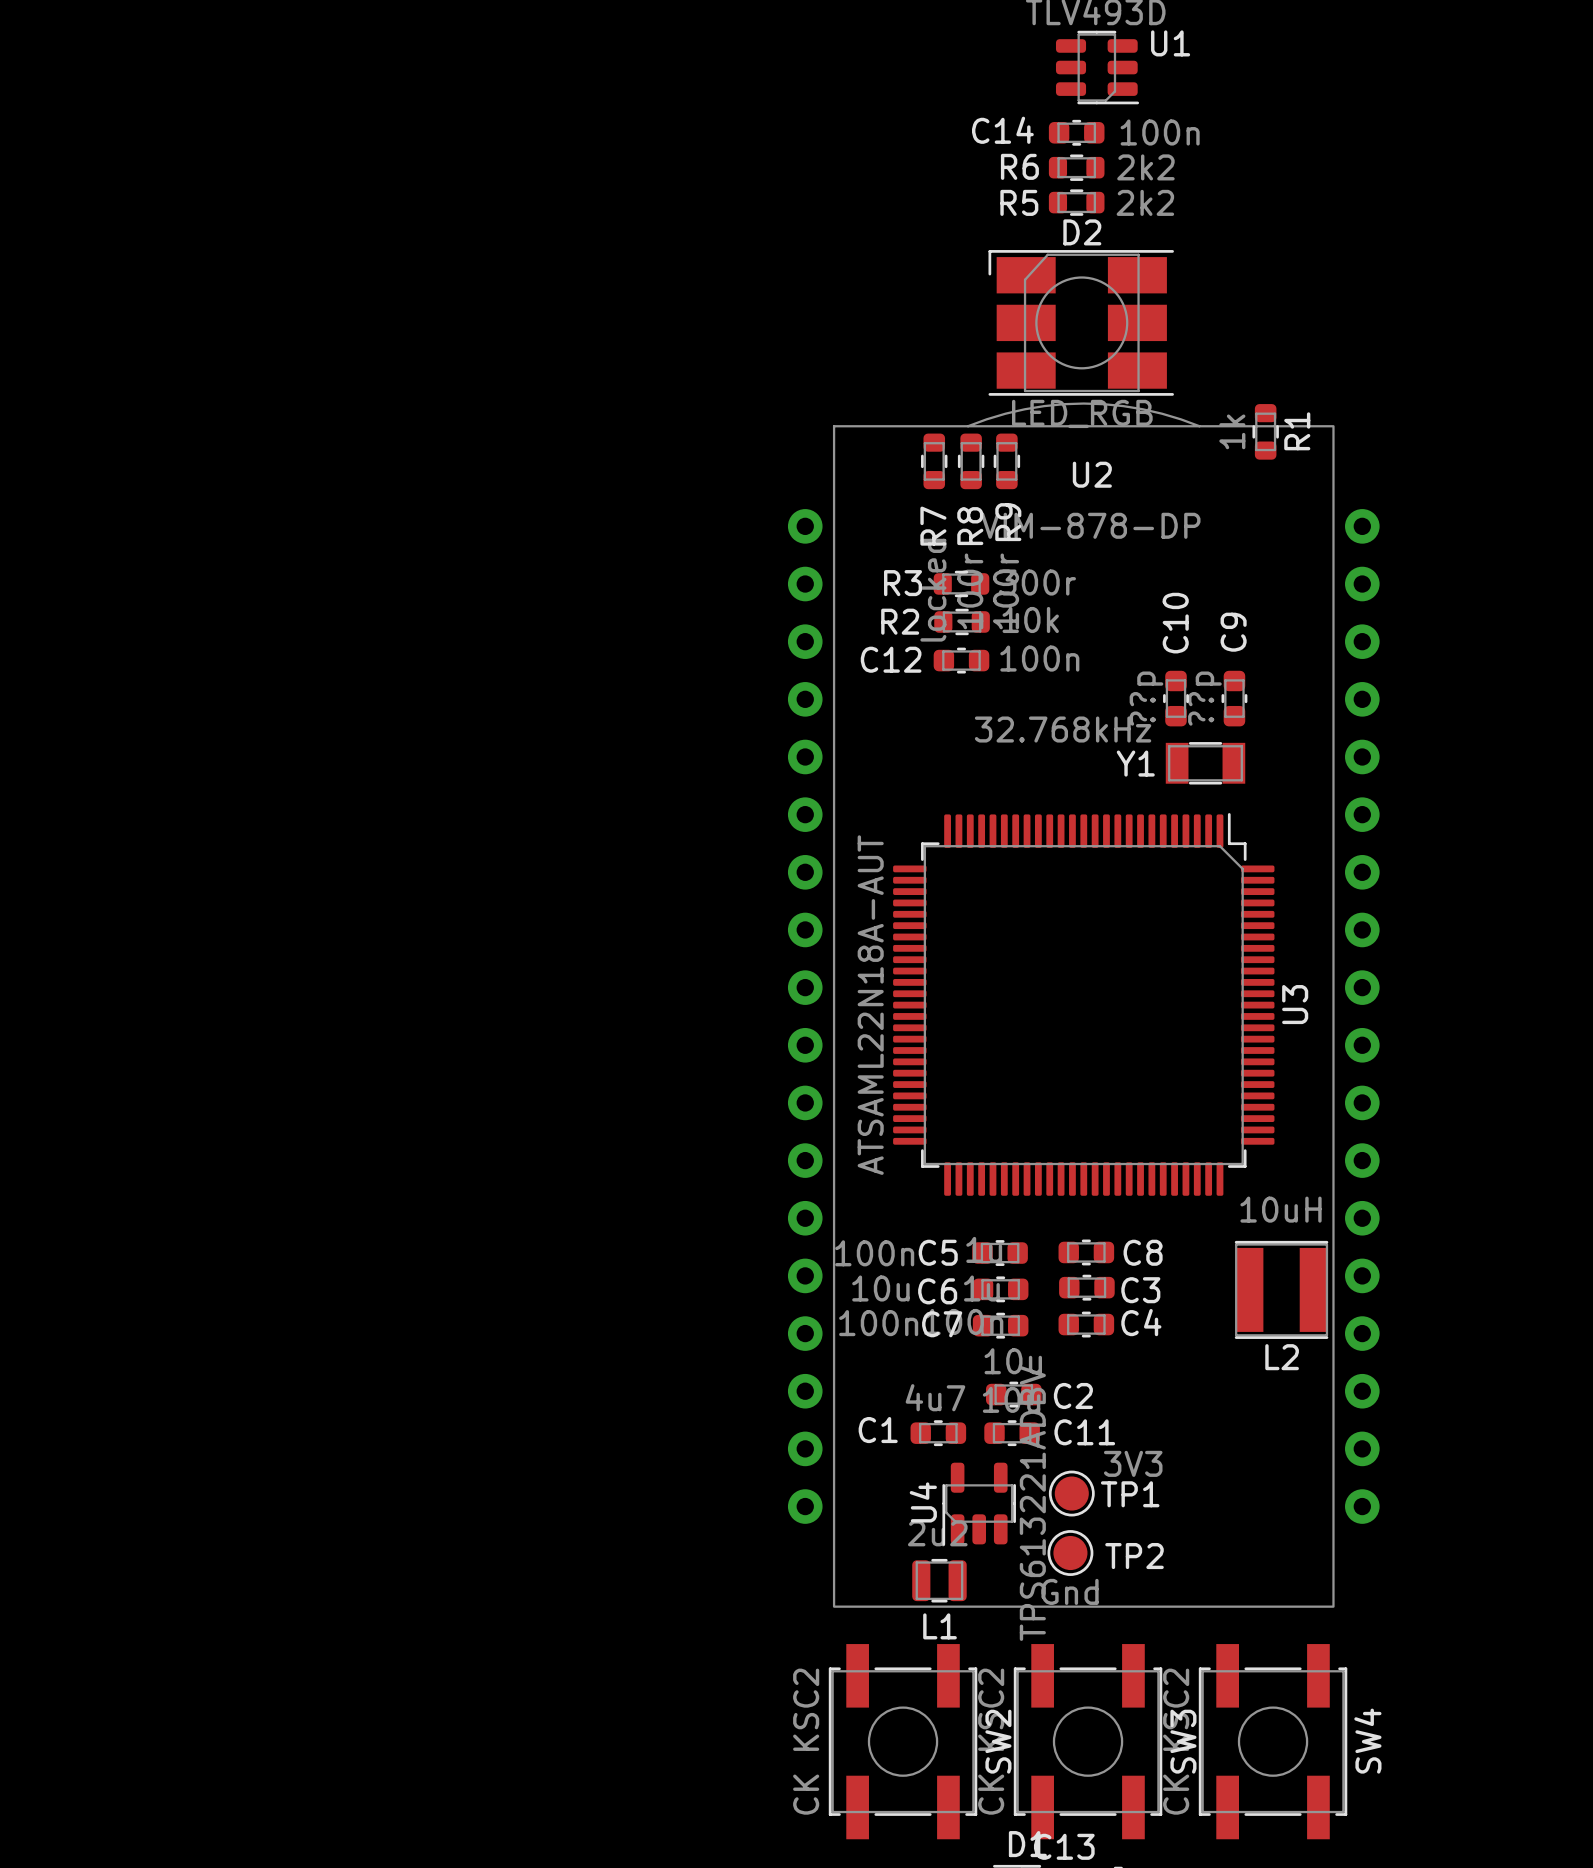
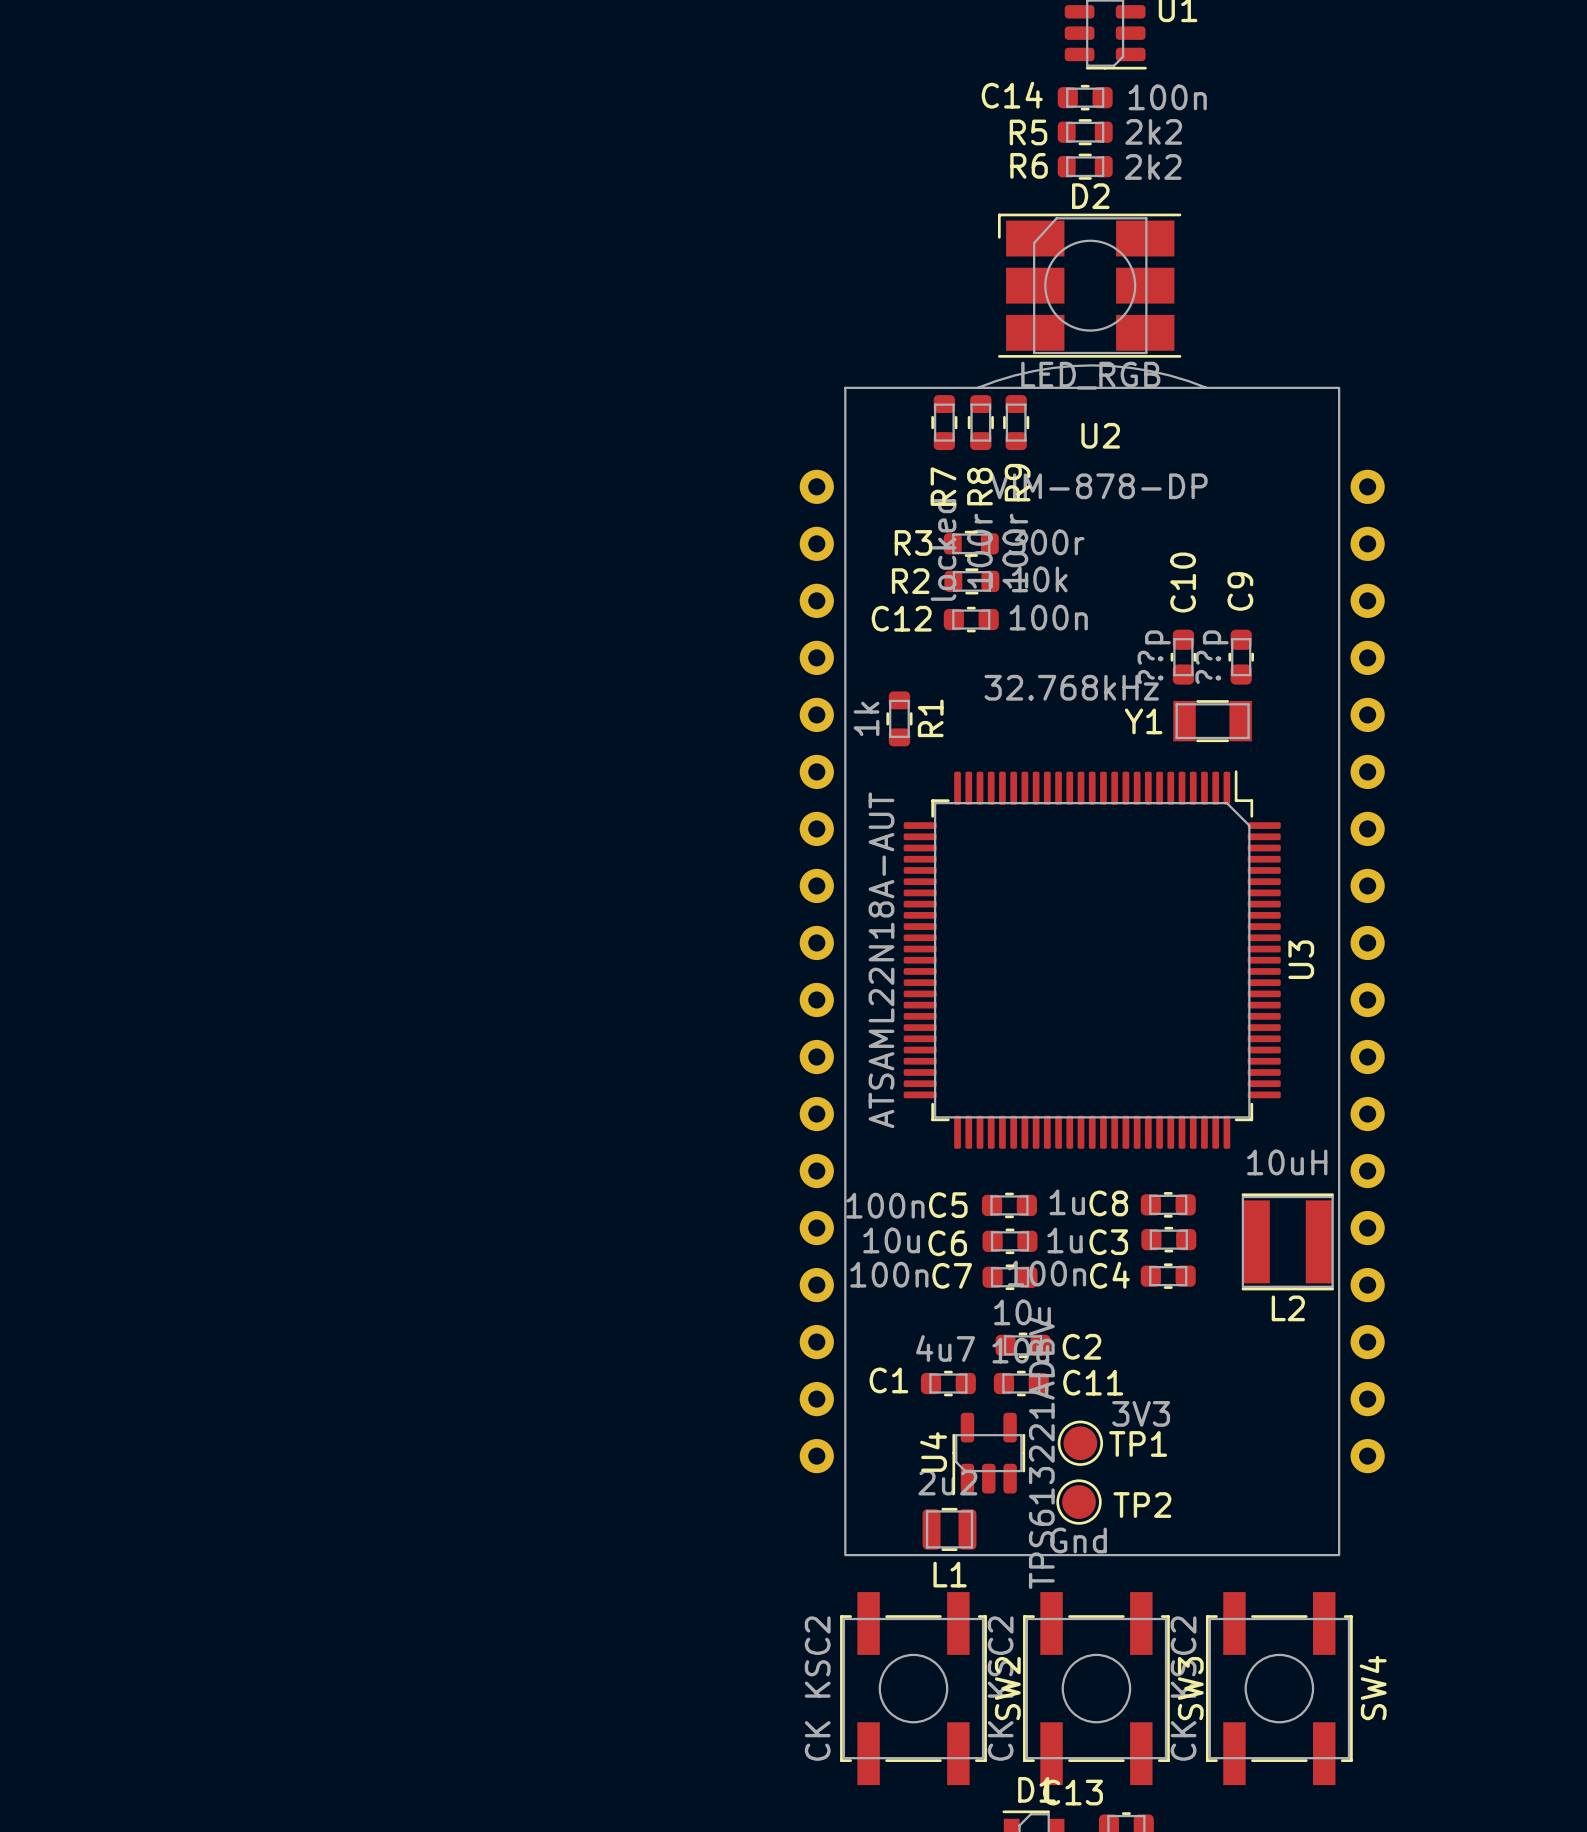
R6 name: R6 (1019, 166) -> R5 (1028, 132)
R5 name: R5 (1019, 202) -> R6 (1029, 165)
R1 position: (1265, 431) -> (899, 718)
C8 position: (1086, 1252) -> (1168, 1204)
C8 name position: C8 (1143, 1252) -> C8 (1108, 1203)
C3 position: (1086, 1287) -> (1168, 1239)
C3 name position: C3 (1140, 1290) -> C3 (1108, 1242)
C4 name position: C4 (1141, 1322) -> C4 (1109, 1275)
C4 position: (1086, 1324) -> (1168, 1276)

